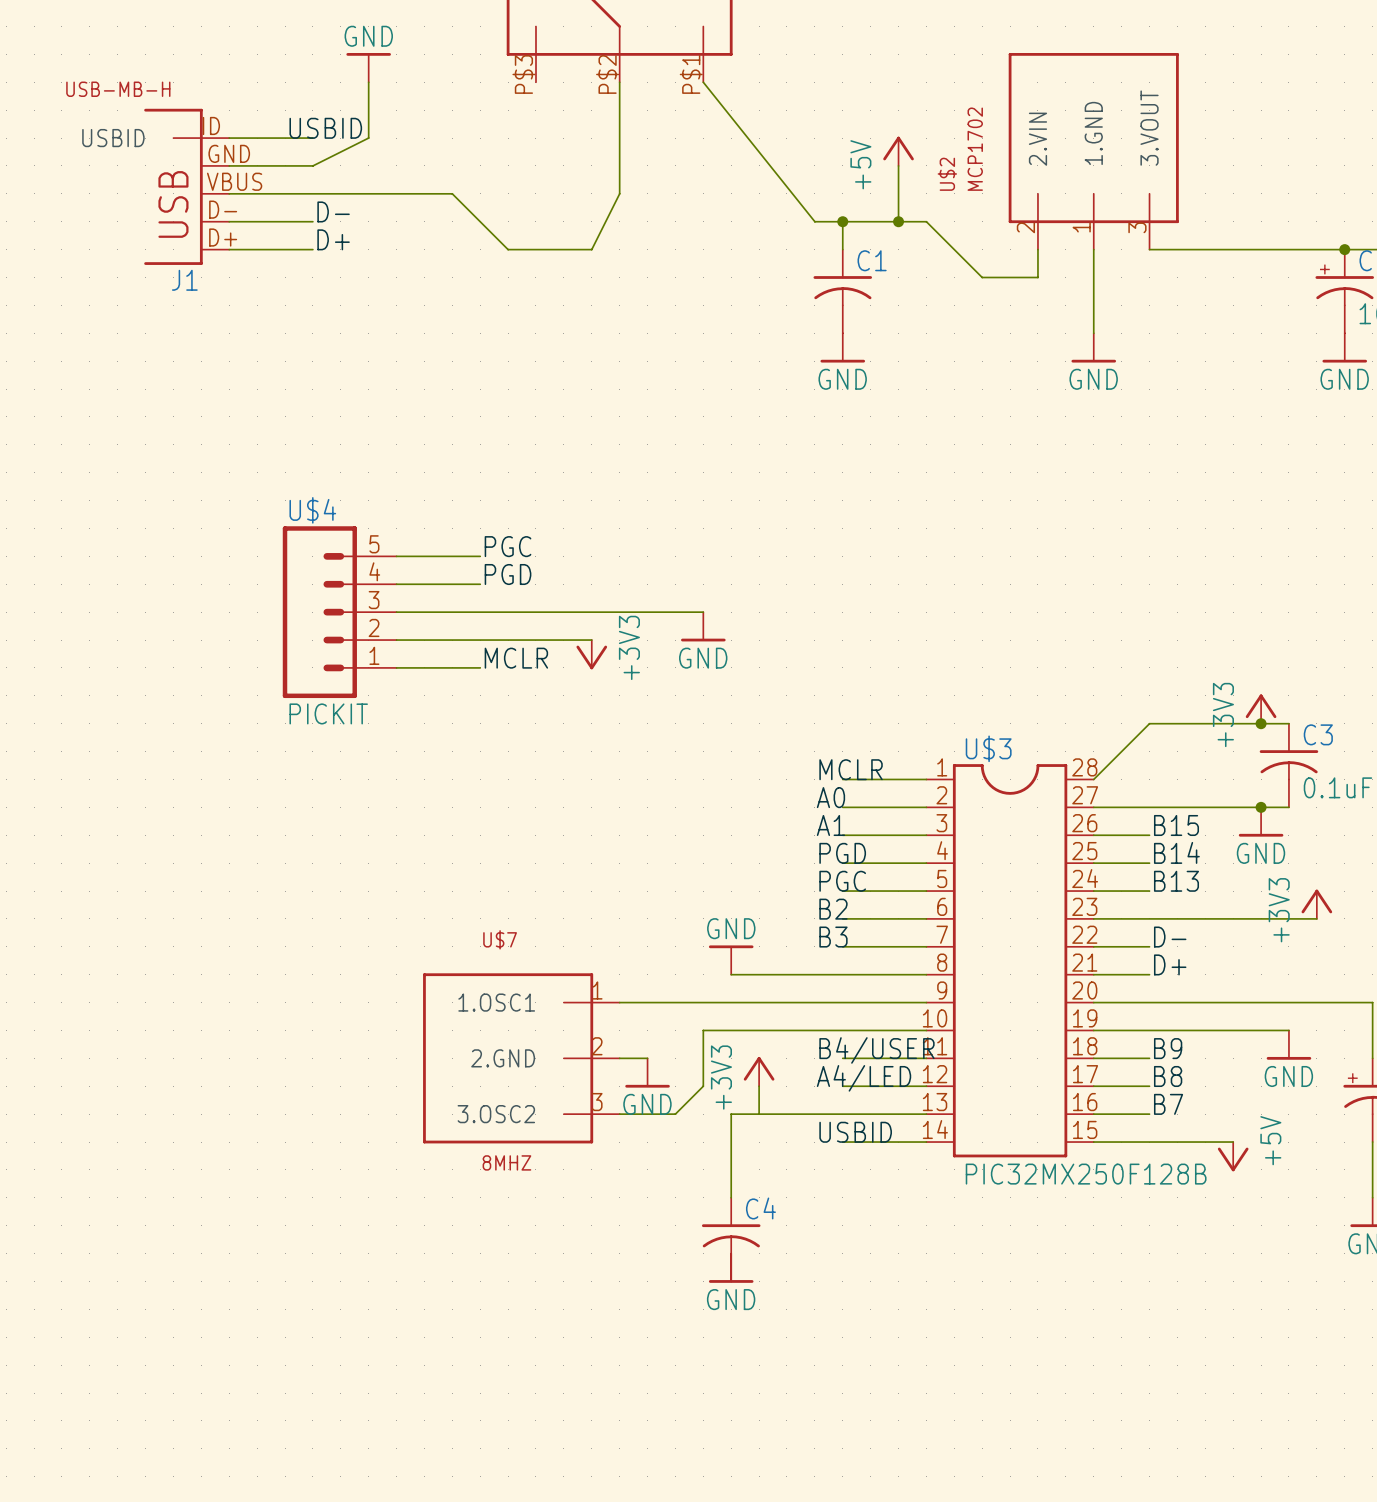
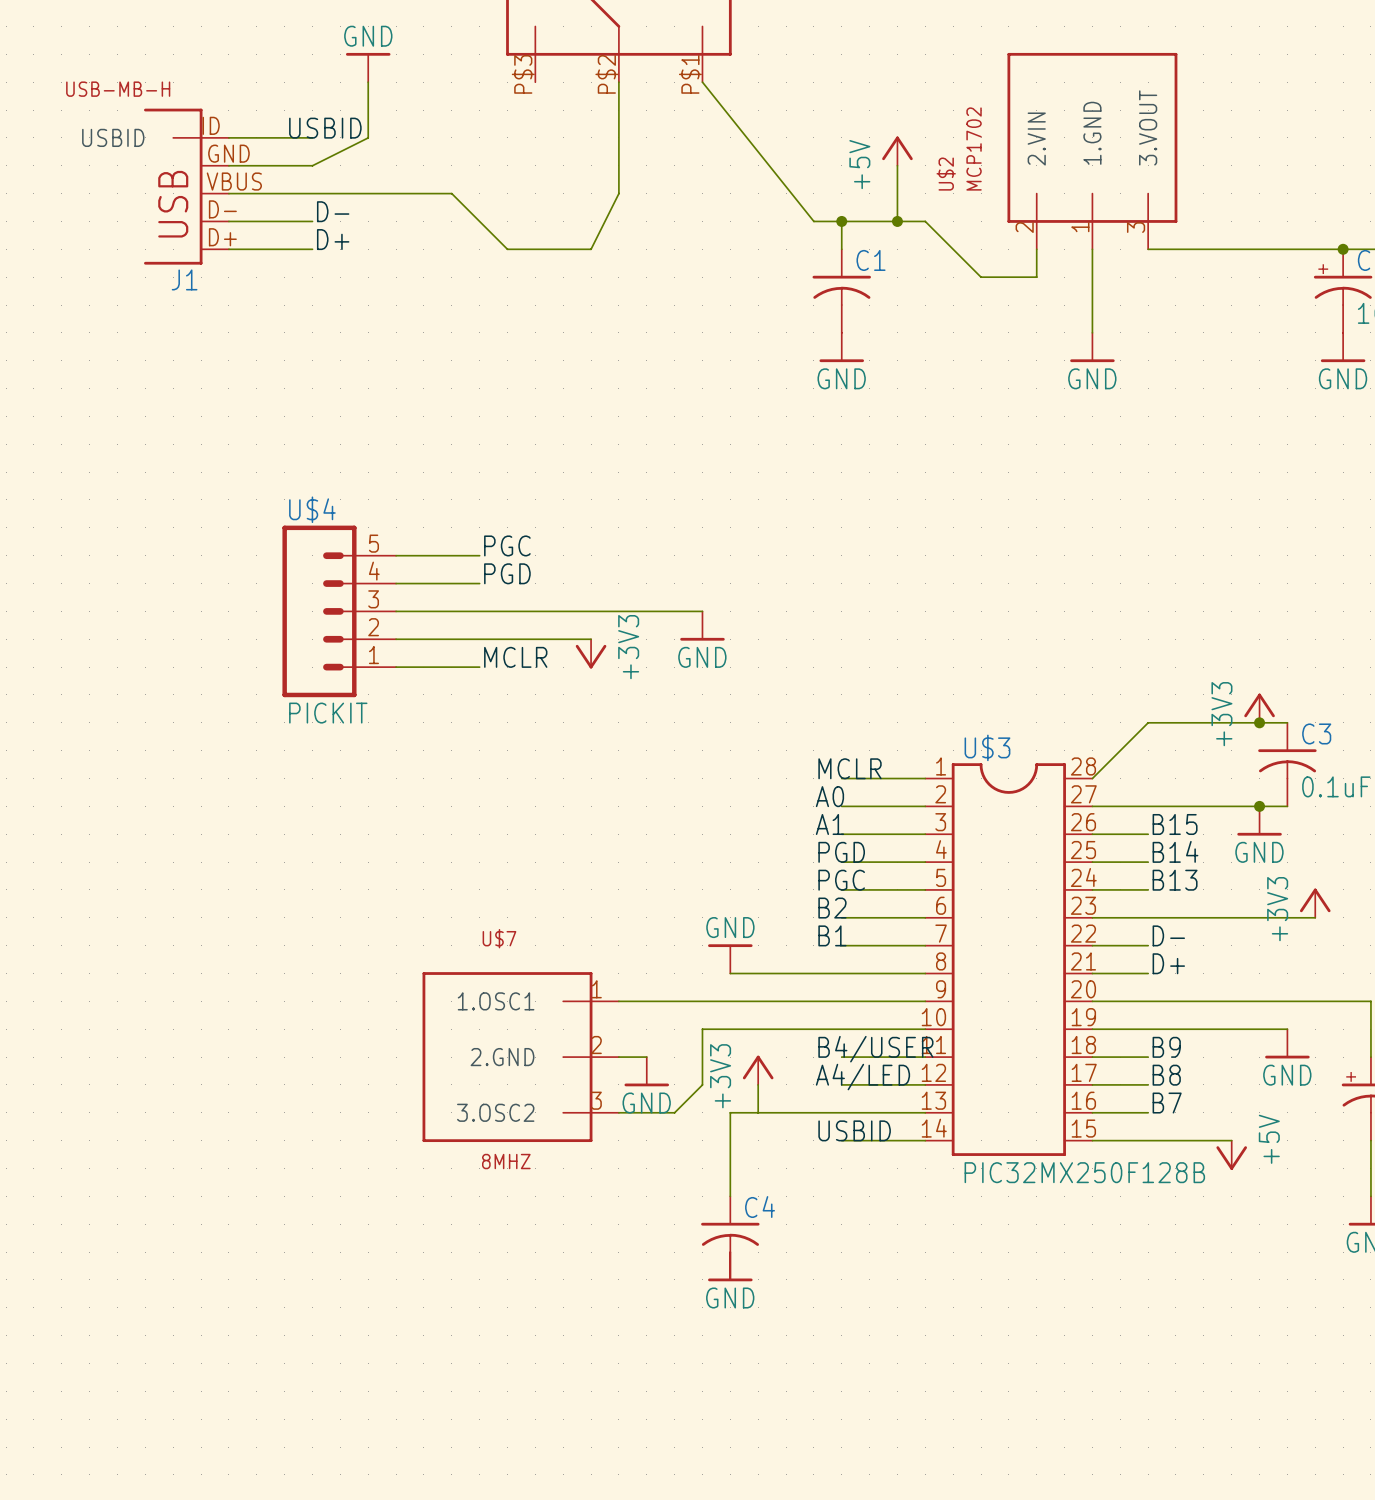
label: B3 (833, 937) -> B1 (832, 935)

